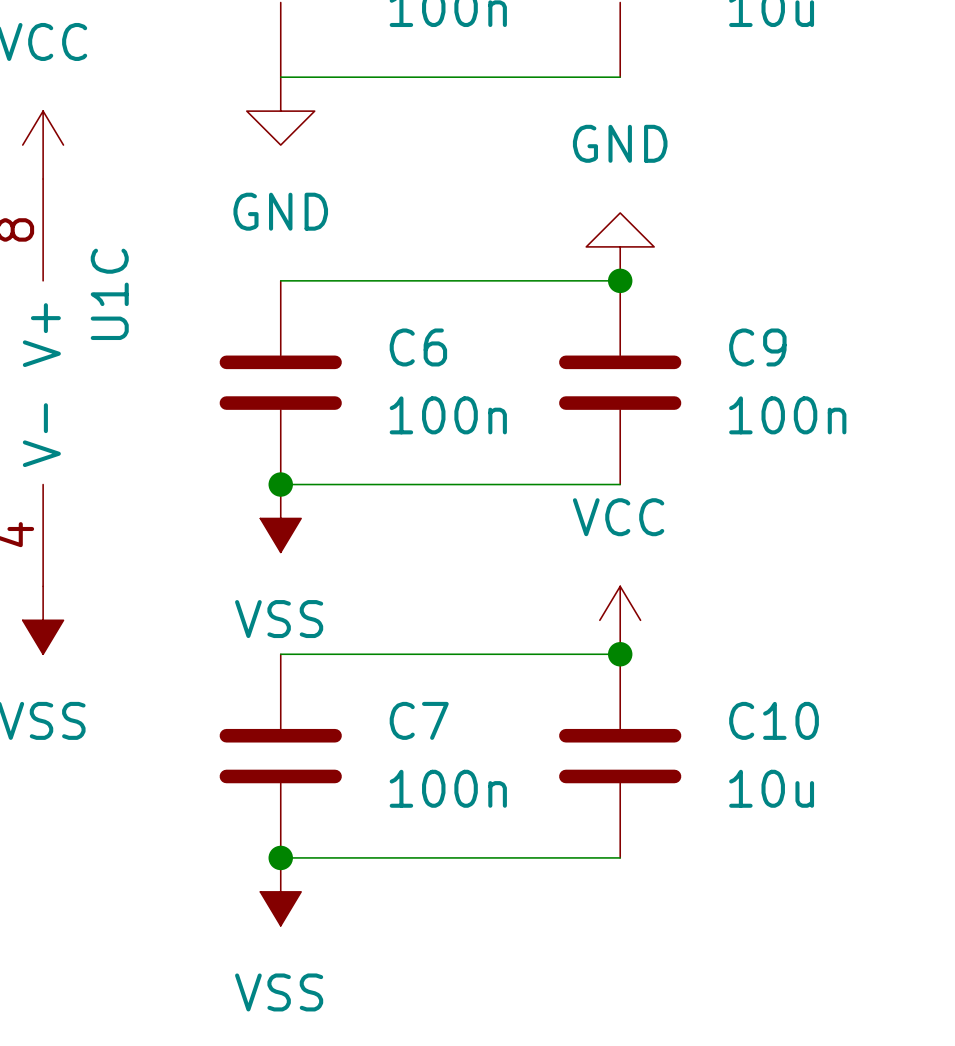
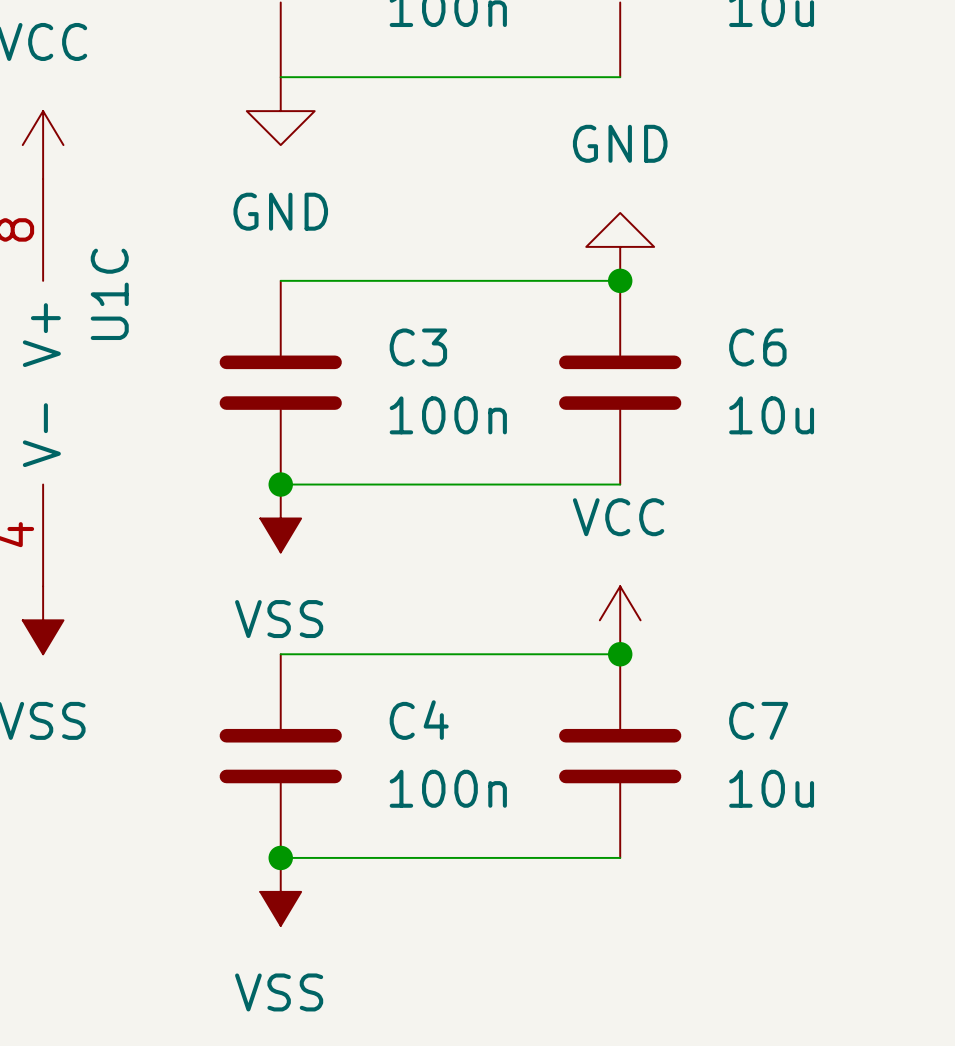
C6 name: C6 (418, 347) -> C3 (418, 347)
C9 name: C9 (757, 347) -> C6 (757, 347)
C9 value: 100n (787, 415) -> 10u (771, 415)
C7 name: C7 (419, 720) -> C4 (419, 720)
C10 name: C10 (774, 720) -> C7 (758, 720)

